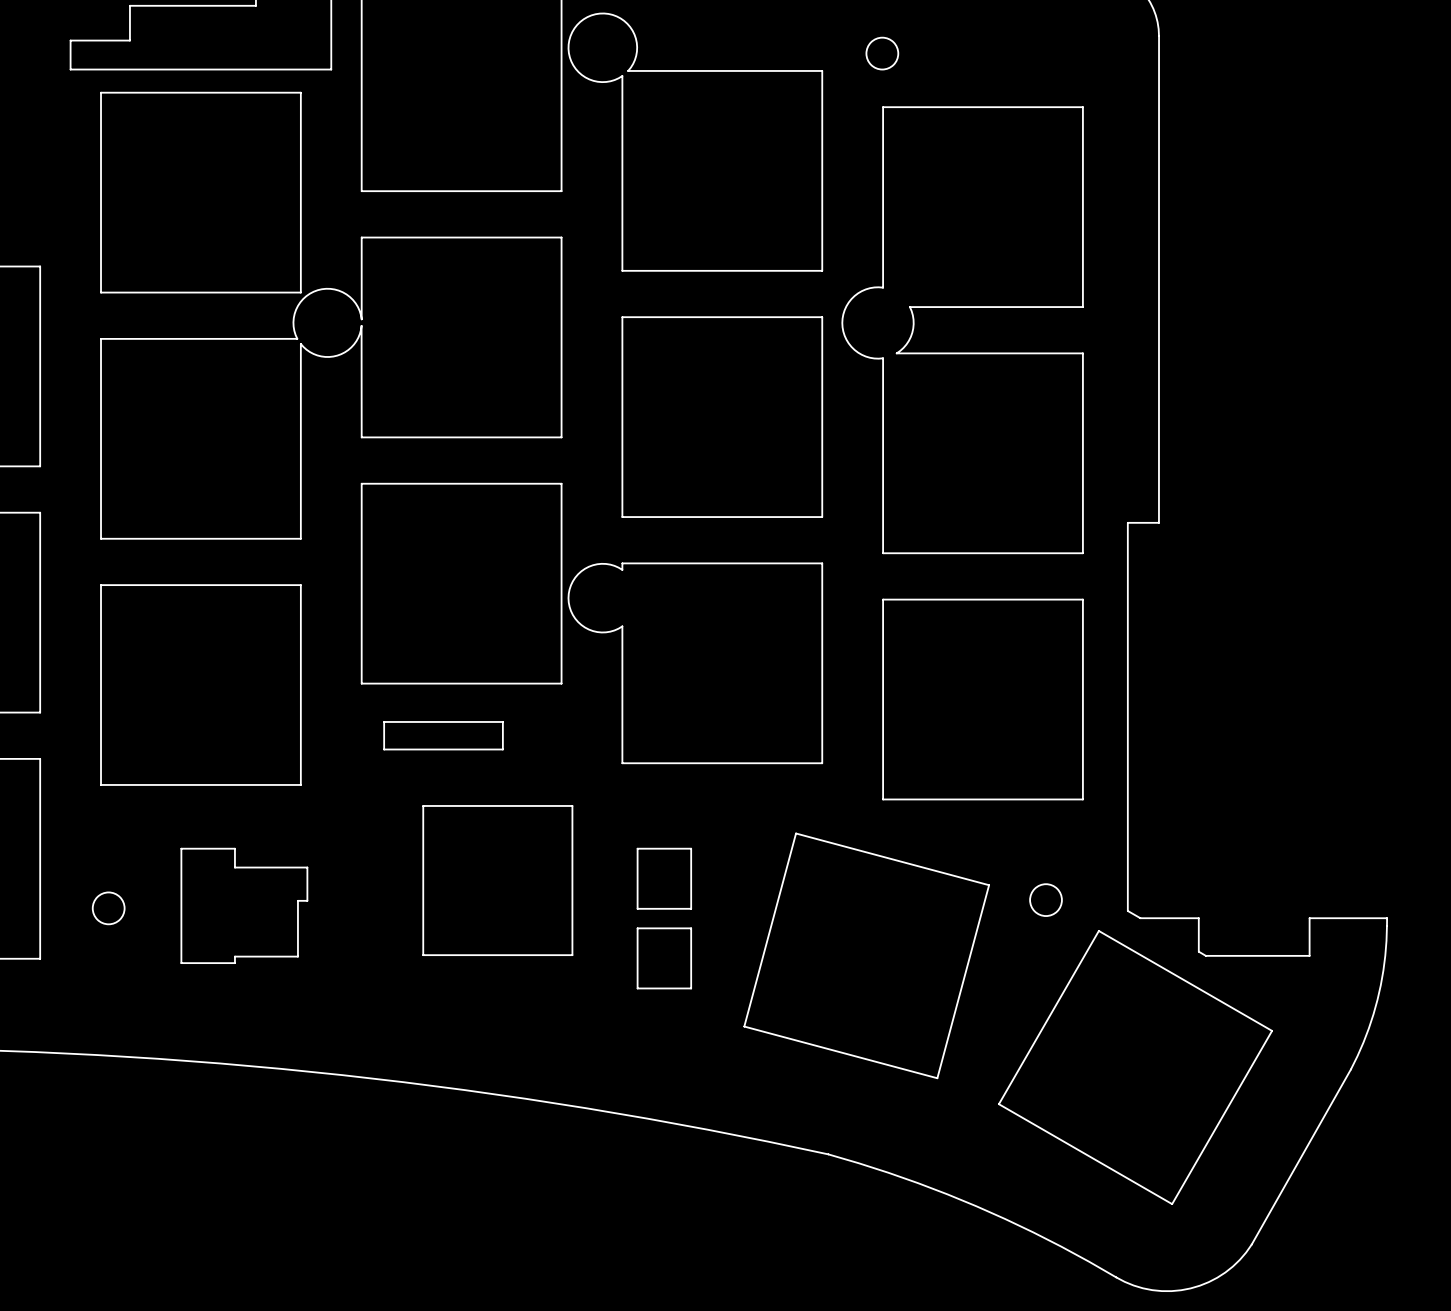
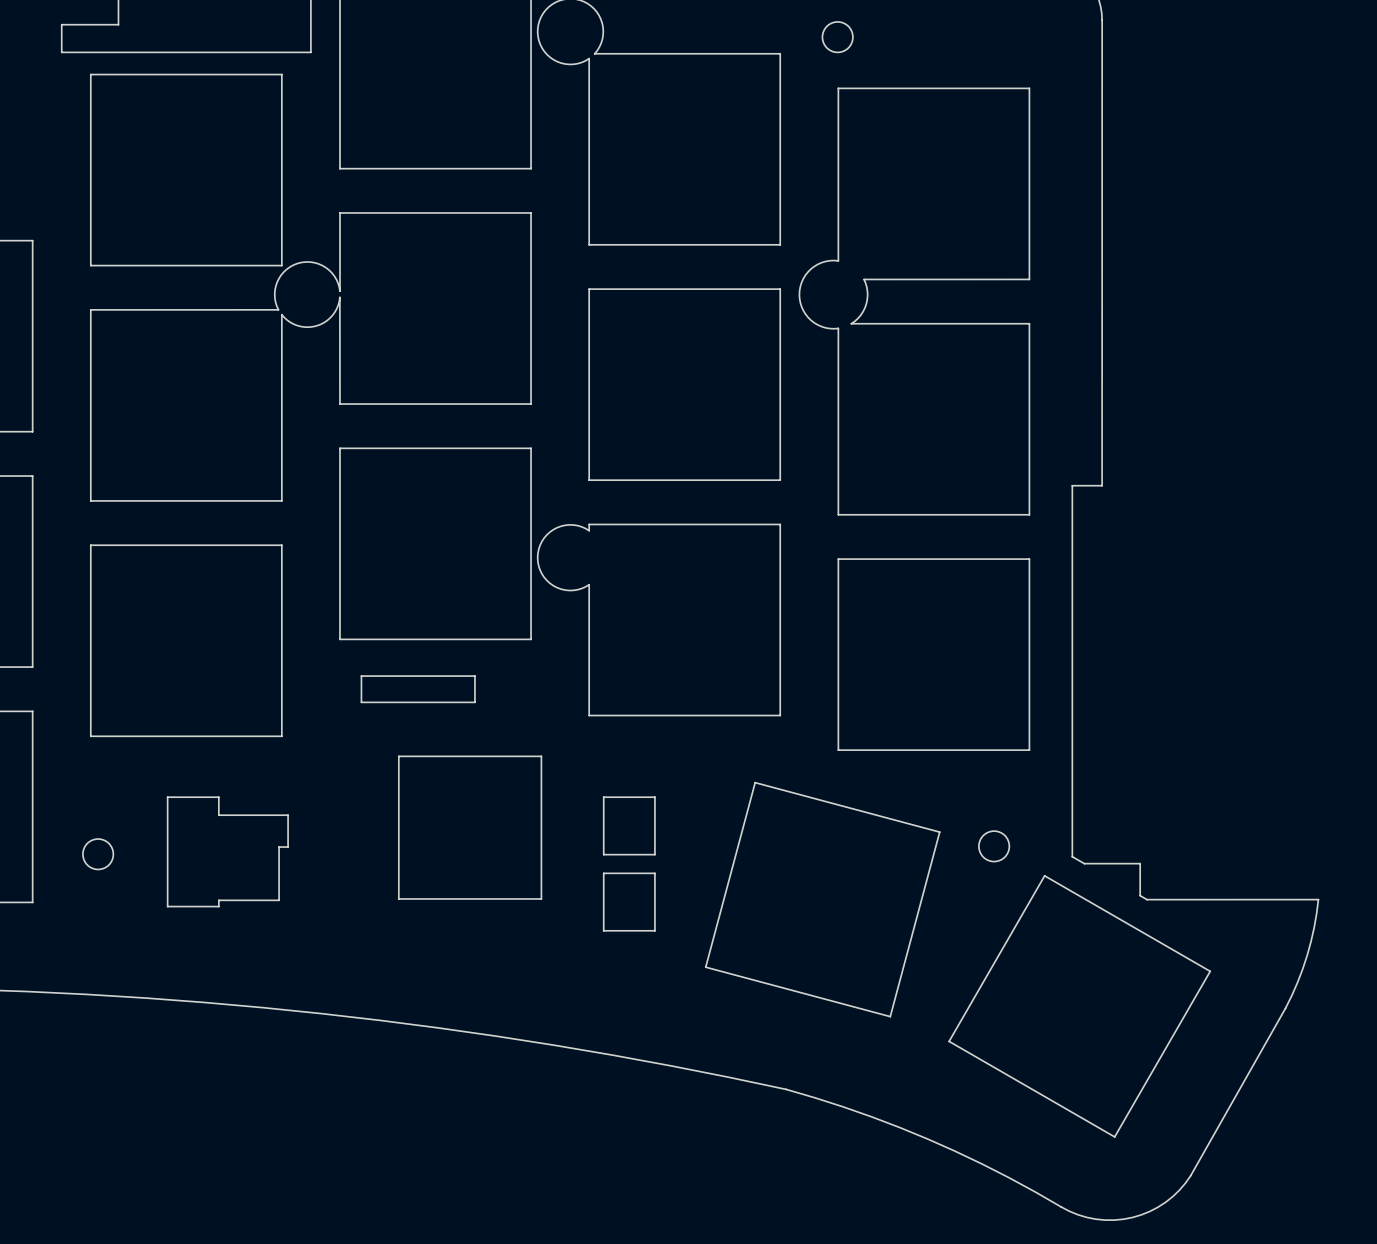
board edge: (1205, 955) (1309, 955) (1309, 918) (1387, 918) (1385, 955) (1377, 999) (1368, 1028) (1350, 1069) -> (1146, 899) (1318, 899) (1307, 955) (1285, 1008)

